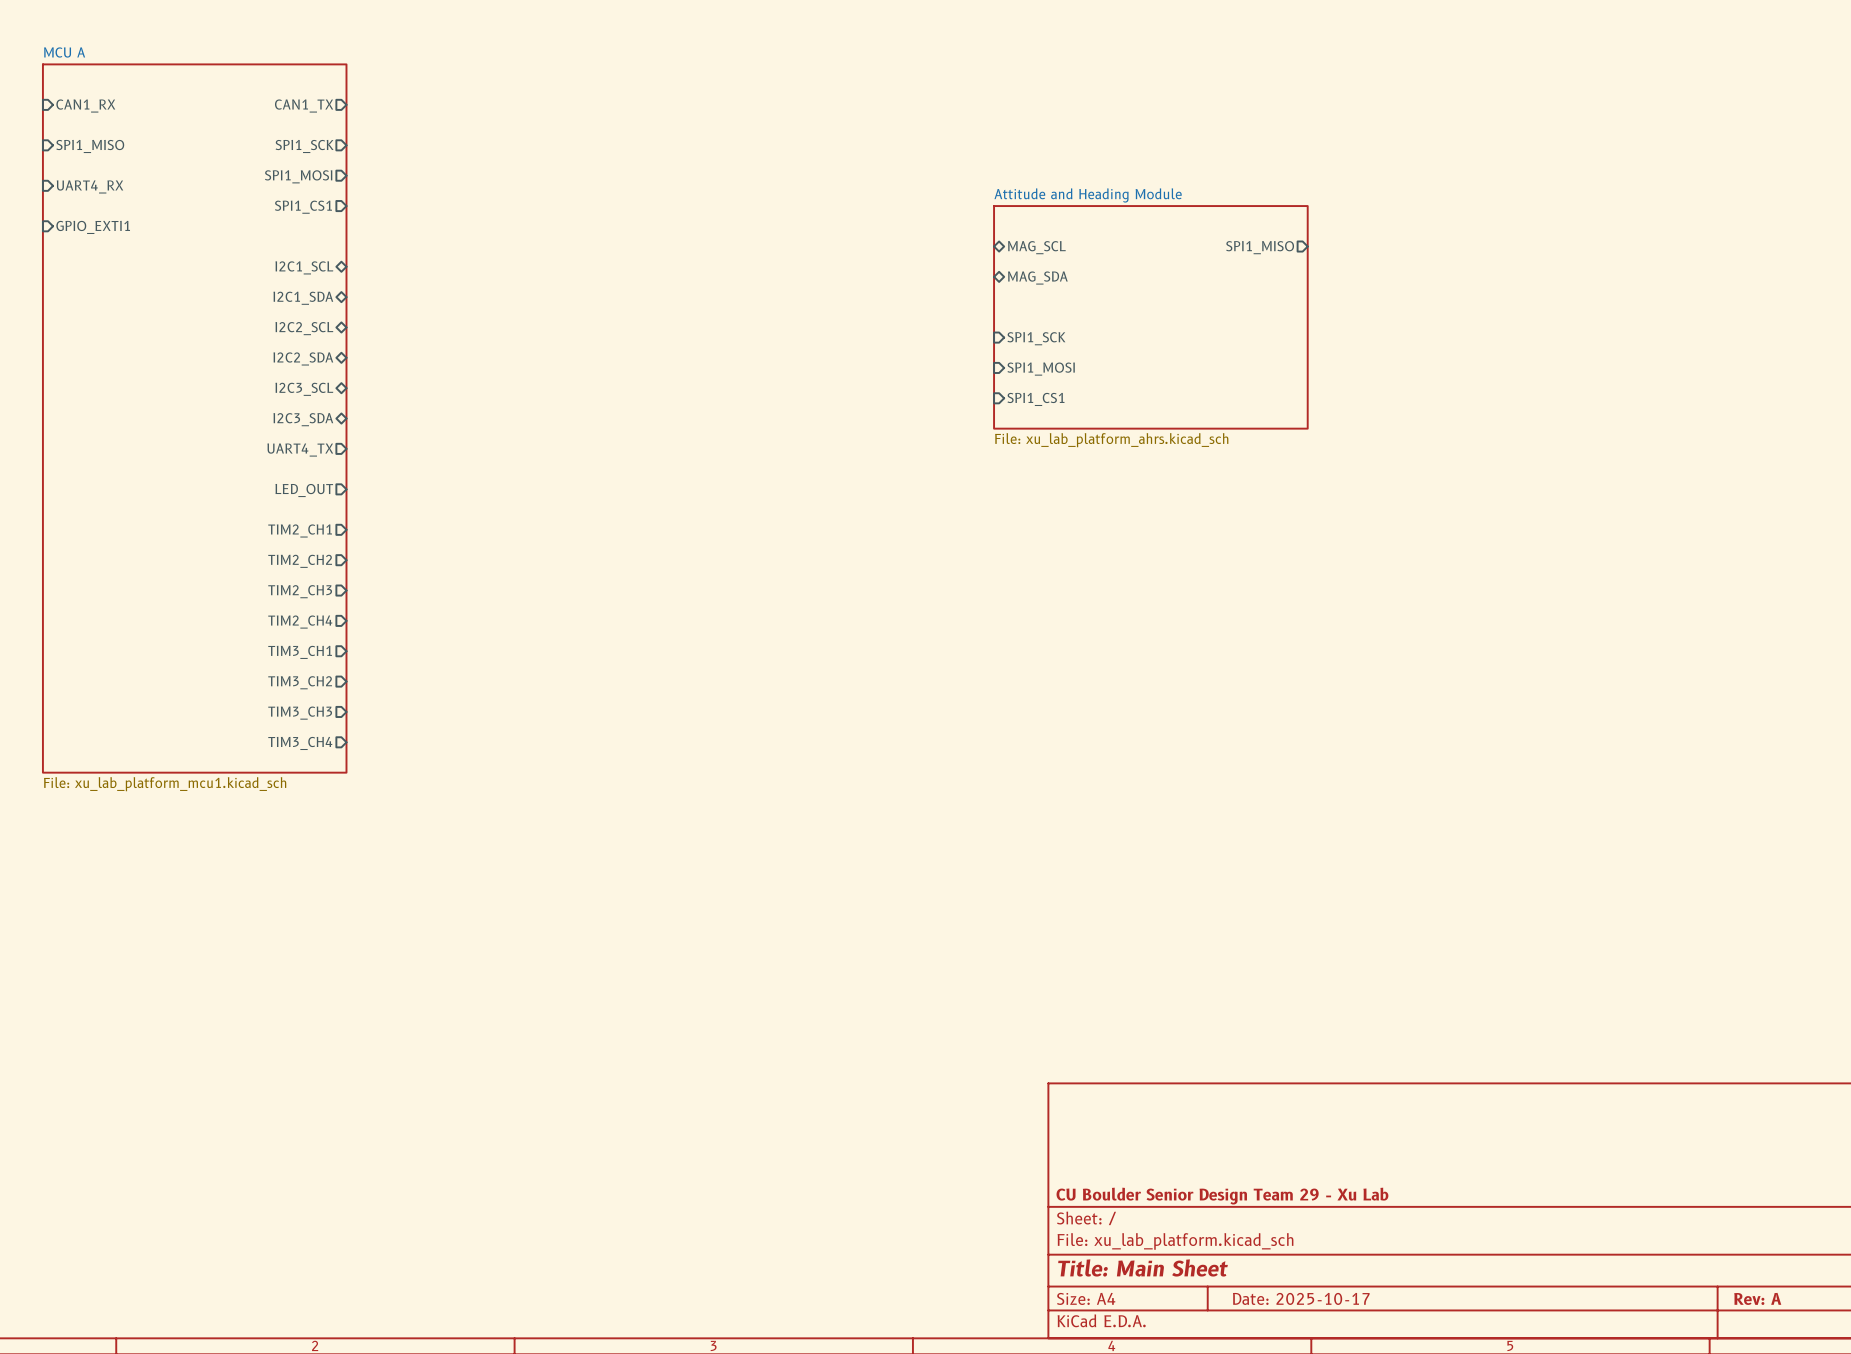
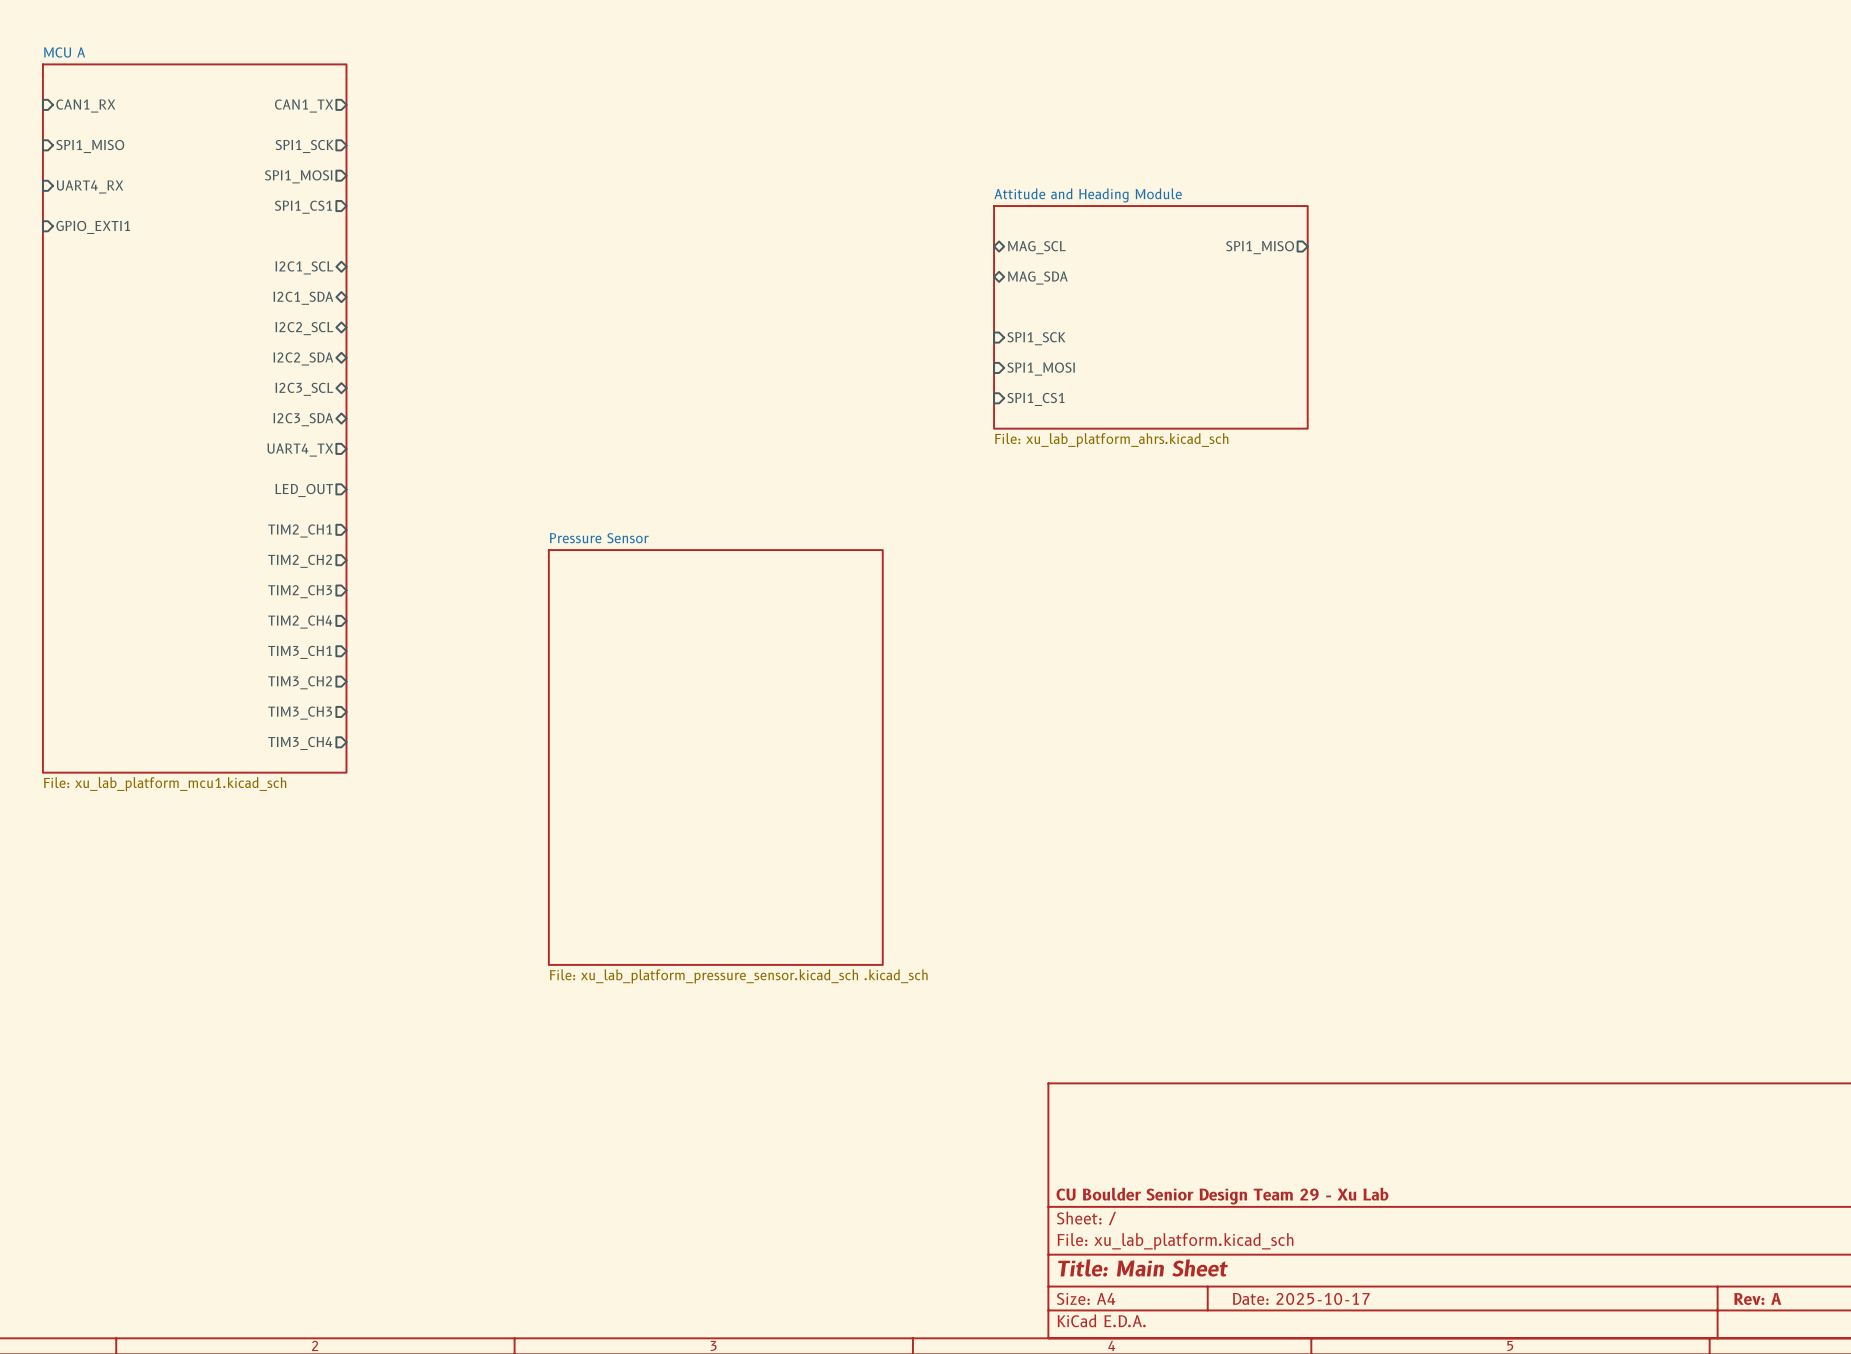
sheet Pressure Sensor: none -> File: xu_lab_platform_pressure_sensor.kicad_sch .kicad_sch (715, 757)

